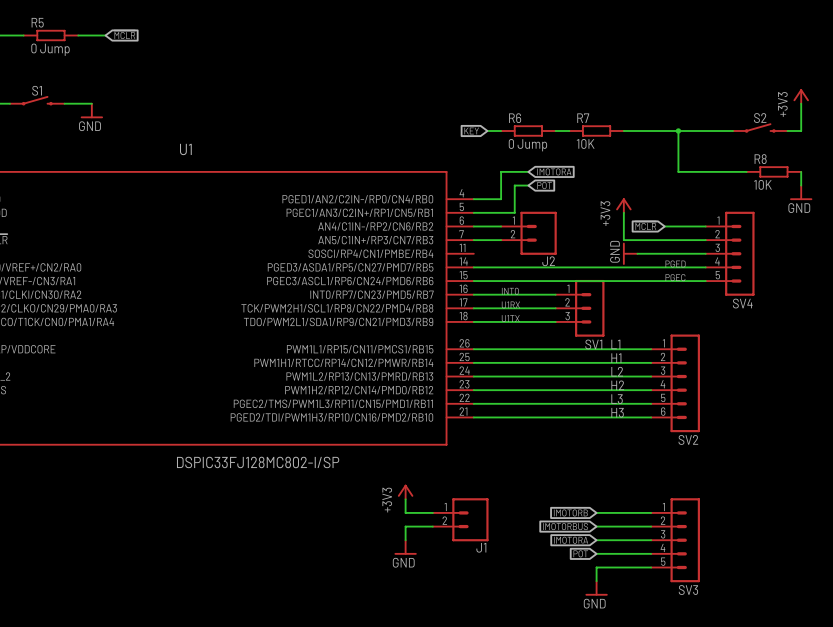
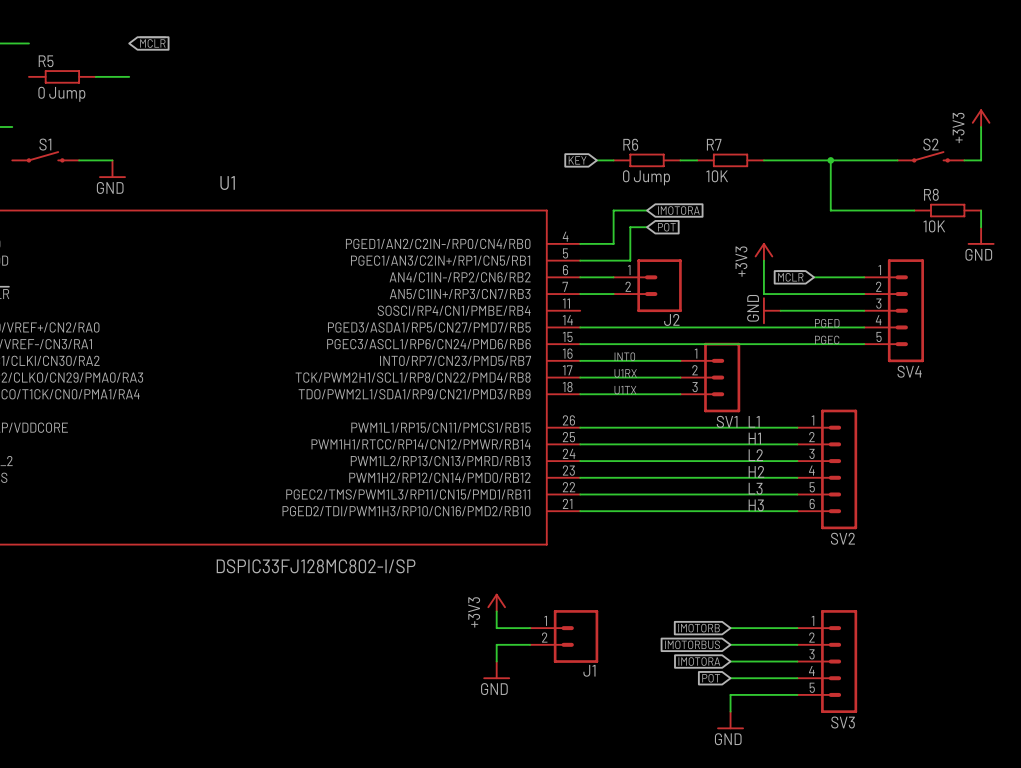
R5 position: (50, 35) -> (62, 76)
wire: (78, 35) (105, 35) -> (95, 76) (129, 76)
S1 position: (37, 100) -> (45, 156)
wire: (64, 103) (91, 103) -> (79, 160) (112, 160)
power symbol position: GND (91, 110) -> GND (112, 169)

